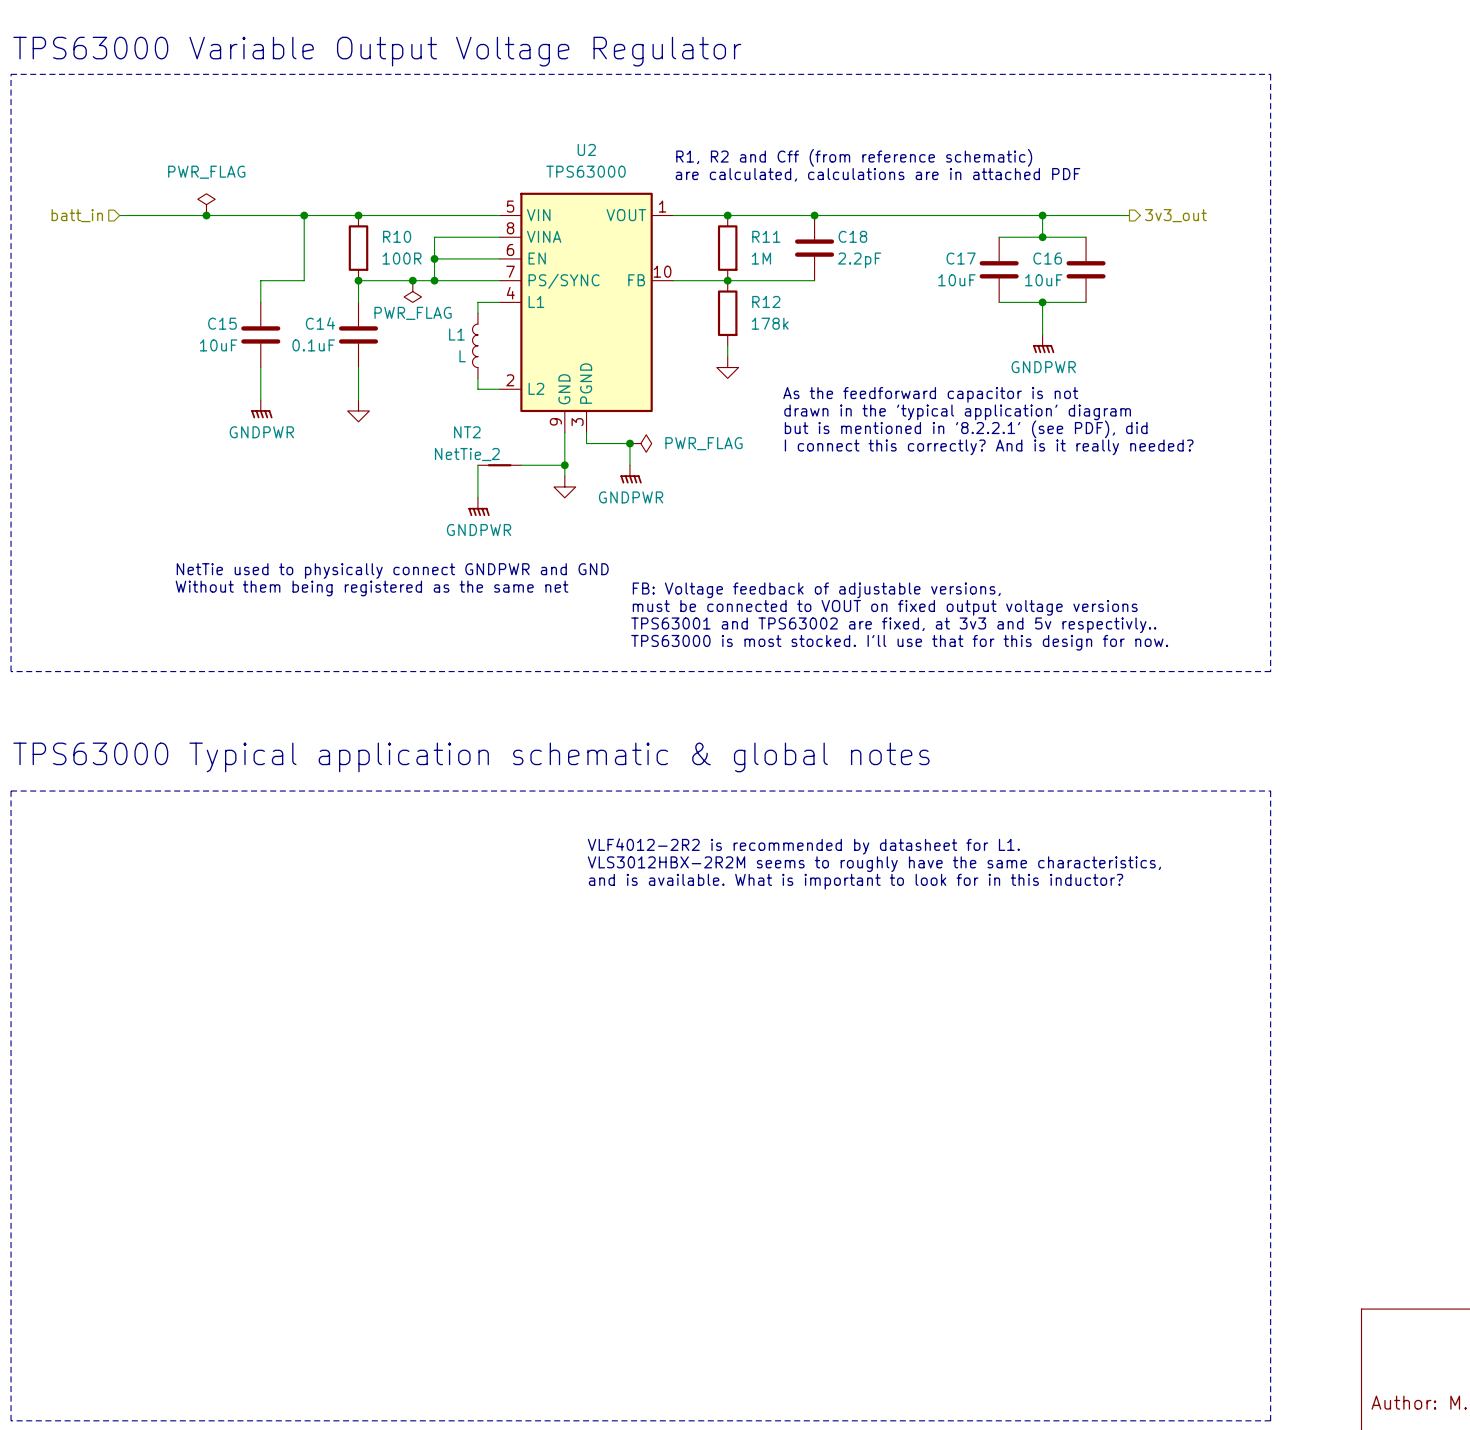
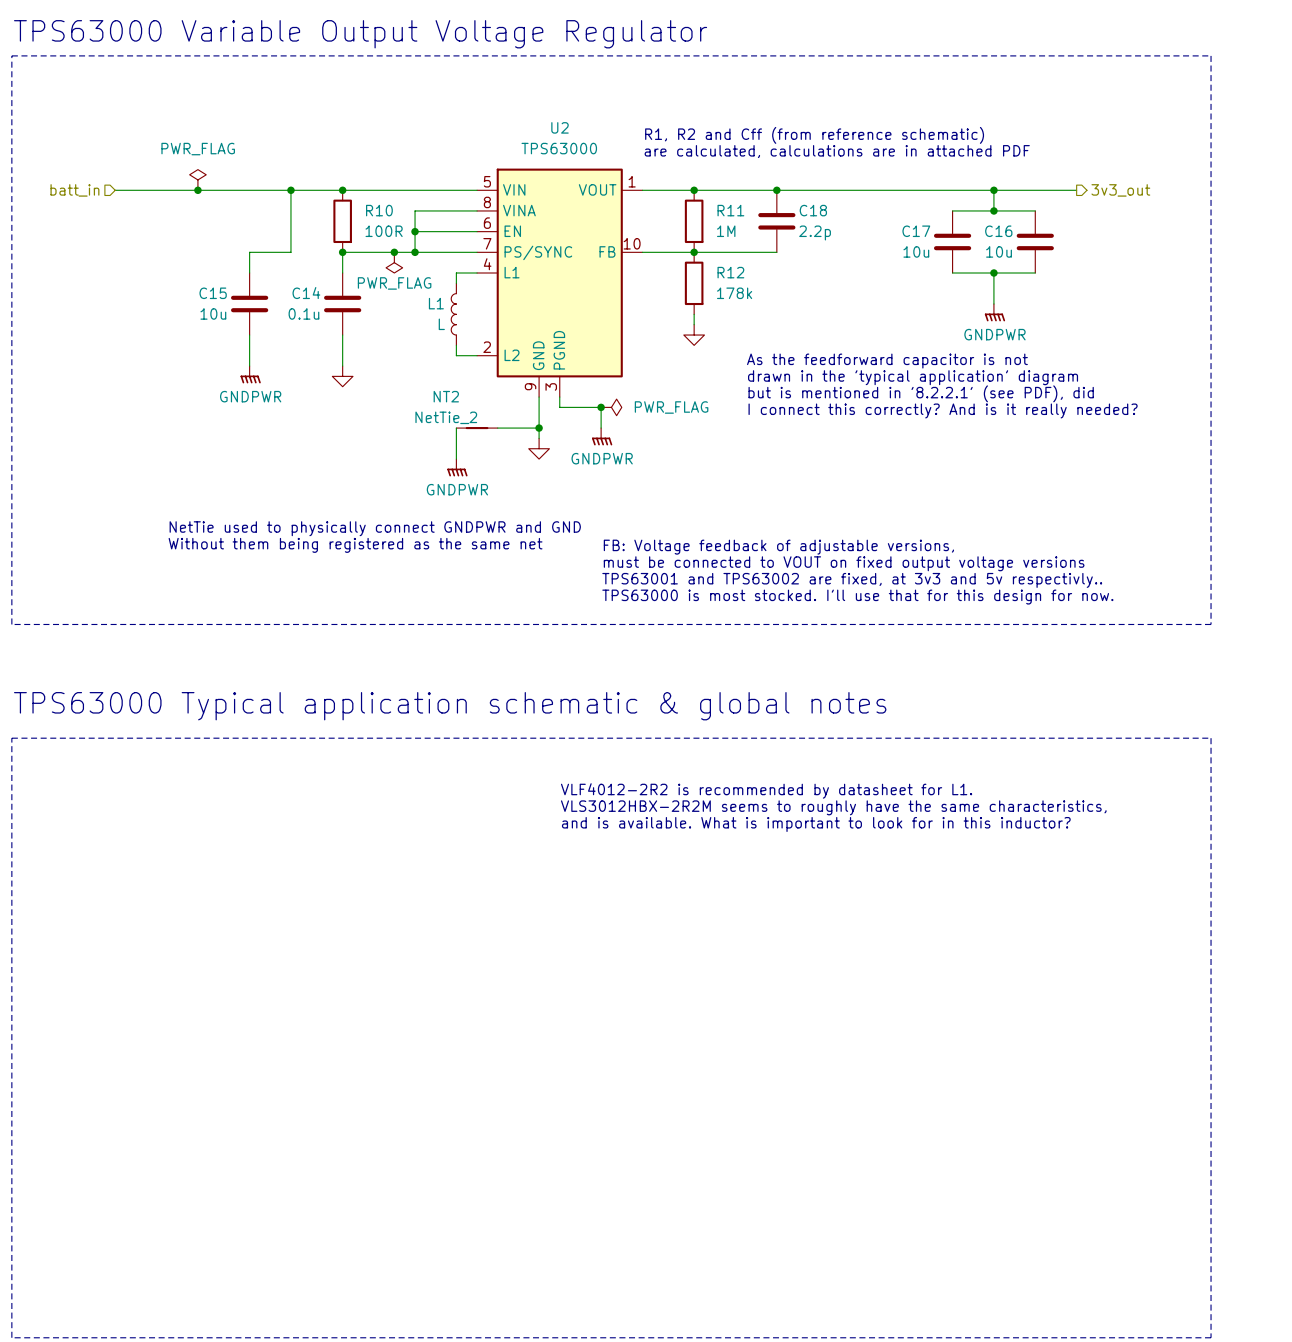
C18 value: 2.2pF (859, 260) -> 2.2p (815, 232)
C17 value: 10uF (956, 280) -> 10u (916, 251)
C16 value: 10uF (1043, 280) -> 10u (999, 251)
C15 value: 10uF (218, 345) -> 10u (213, 313)
C14 value: 0.1uF (313, 345) -> 0.1u (303, 313)

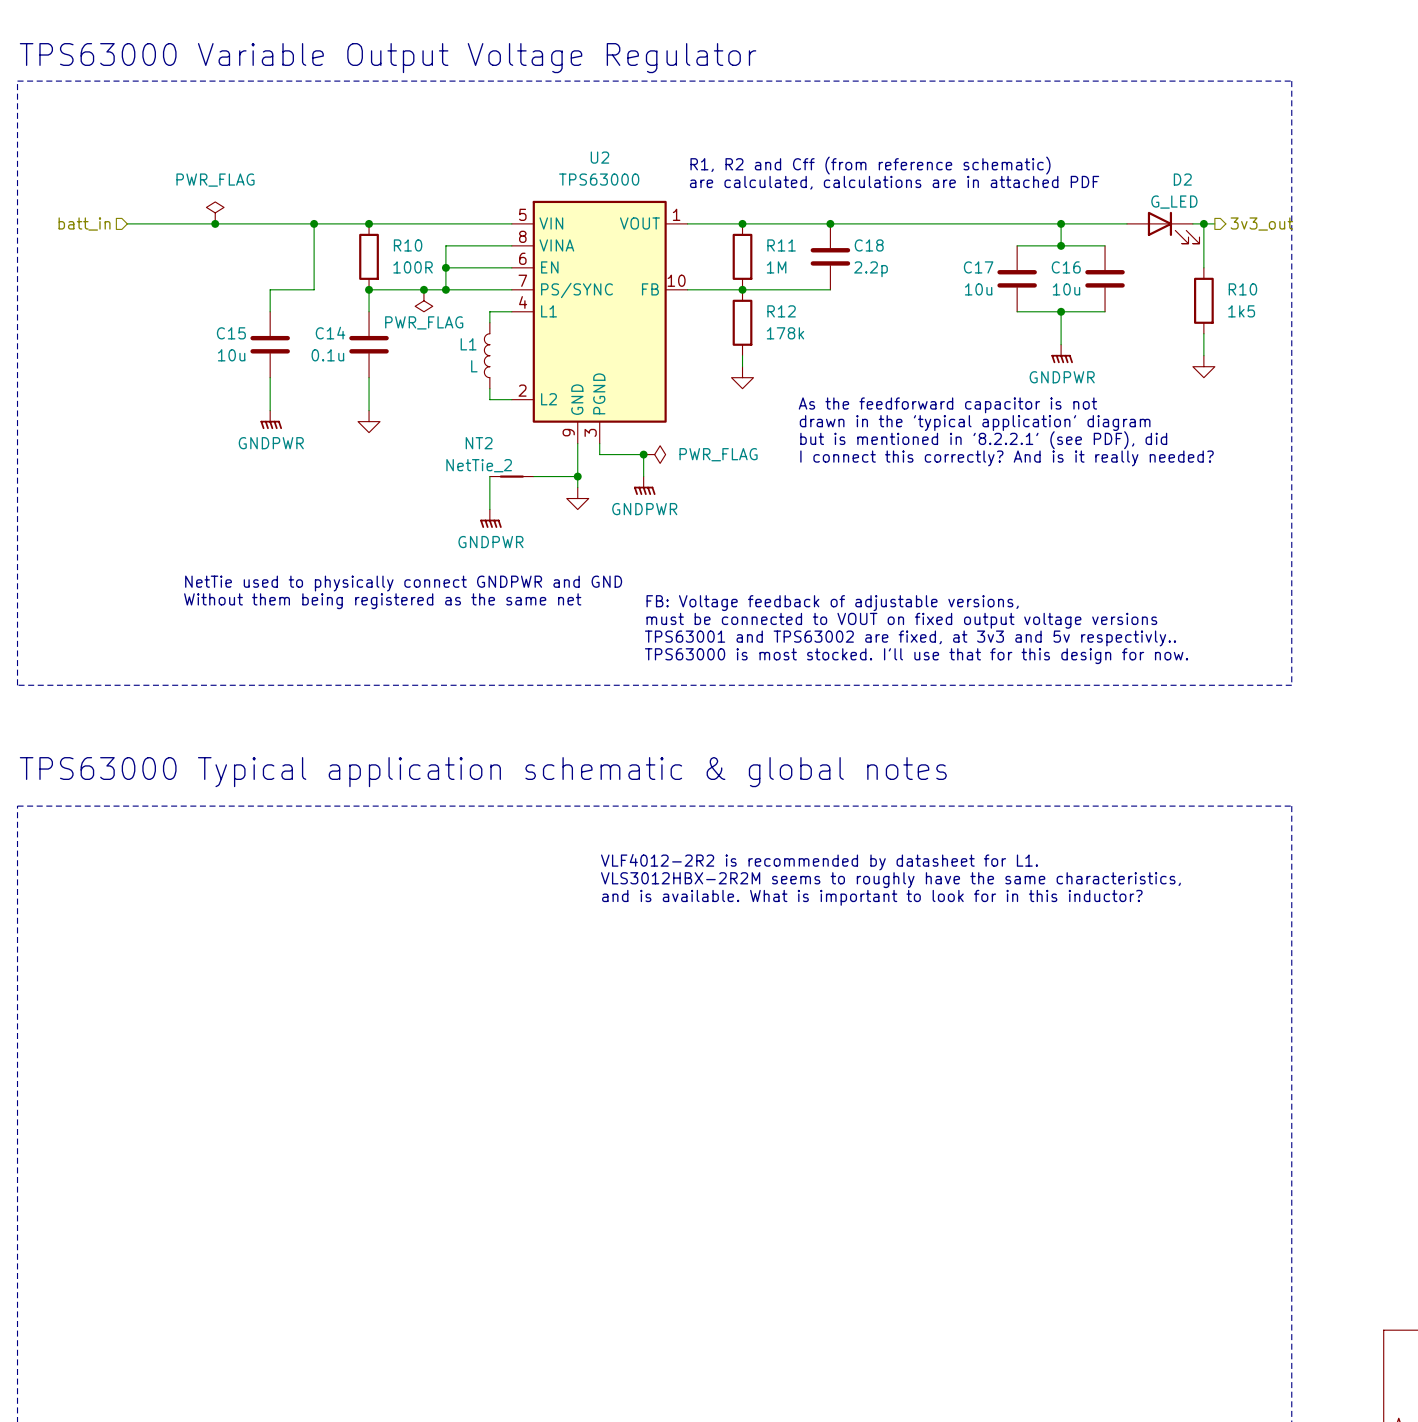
hierarchical label position: 3v3_out (1120, 190) -> 3v3_out (1261, 224)
wire: none -> (1203, 223) (1203, 267)
junction: none -> (1203, 223)
D2: none -> G_LED (1163, 227)
R10: none -> 1k5 (1203, 300)
wire: none -> (1203, 333) (1203, 355)
power symbol: none -> (1203, 366)

